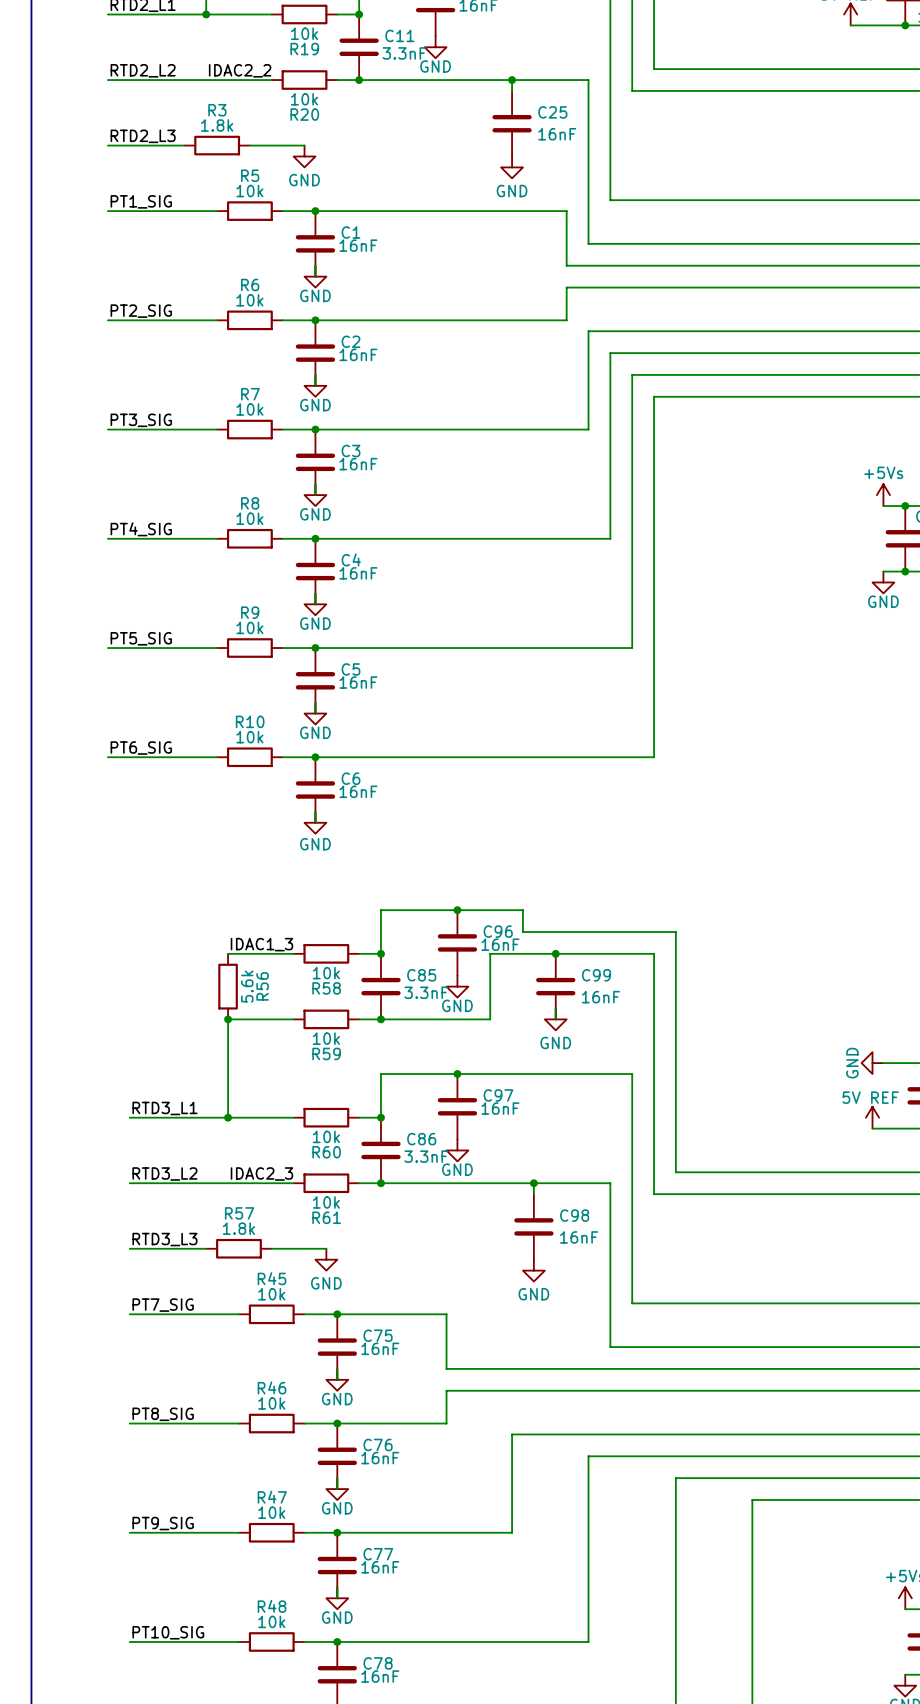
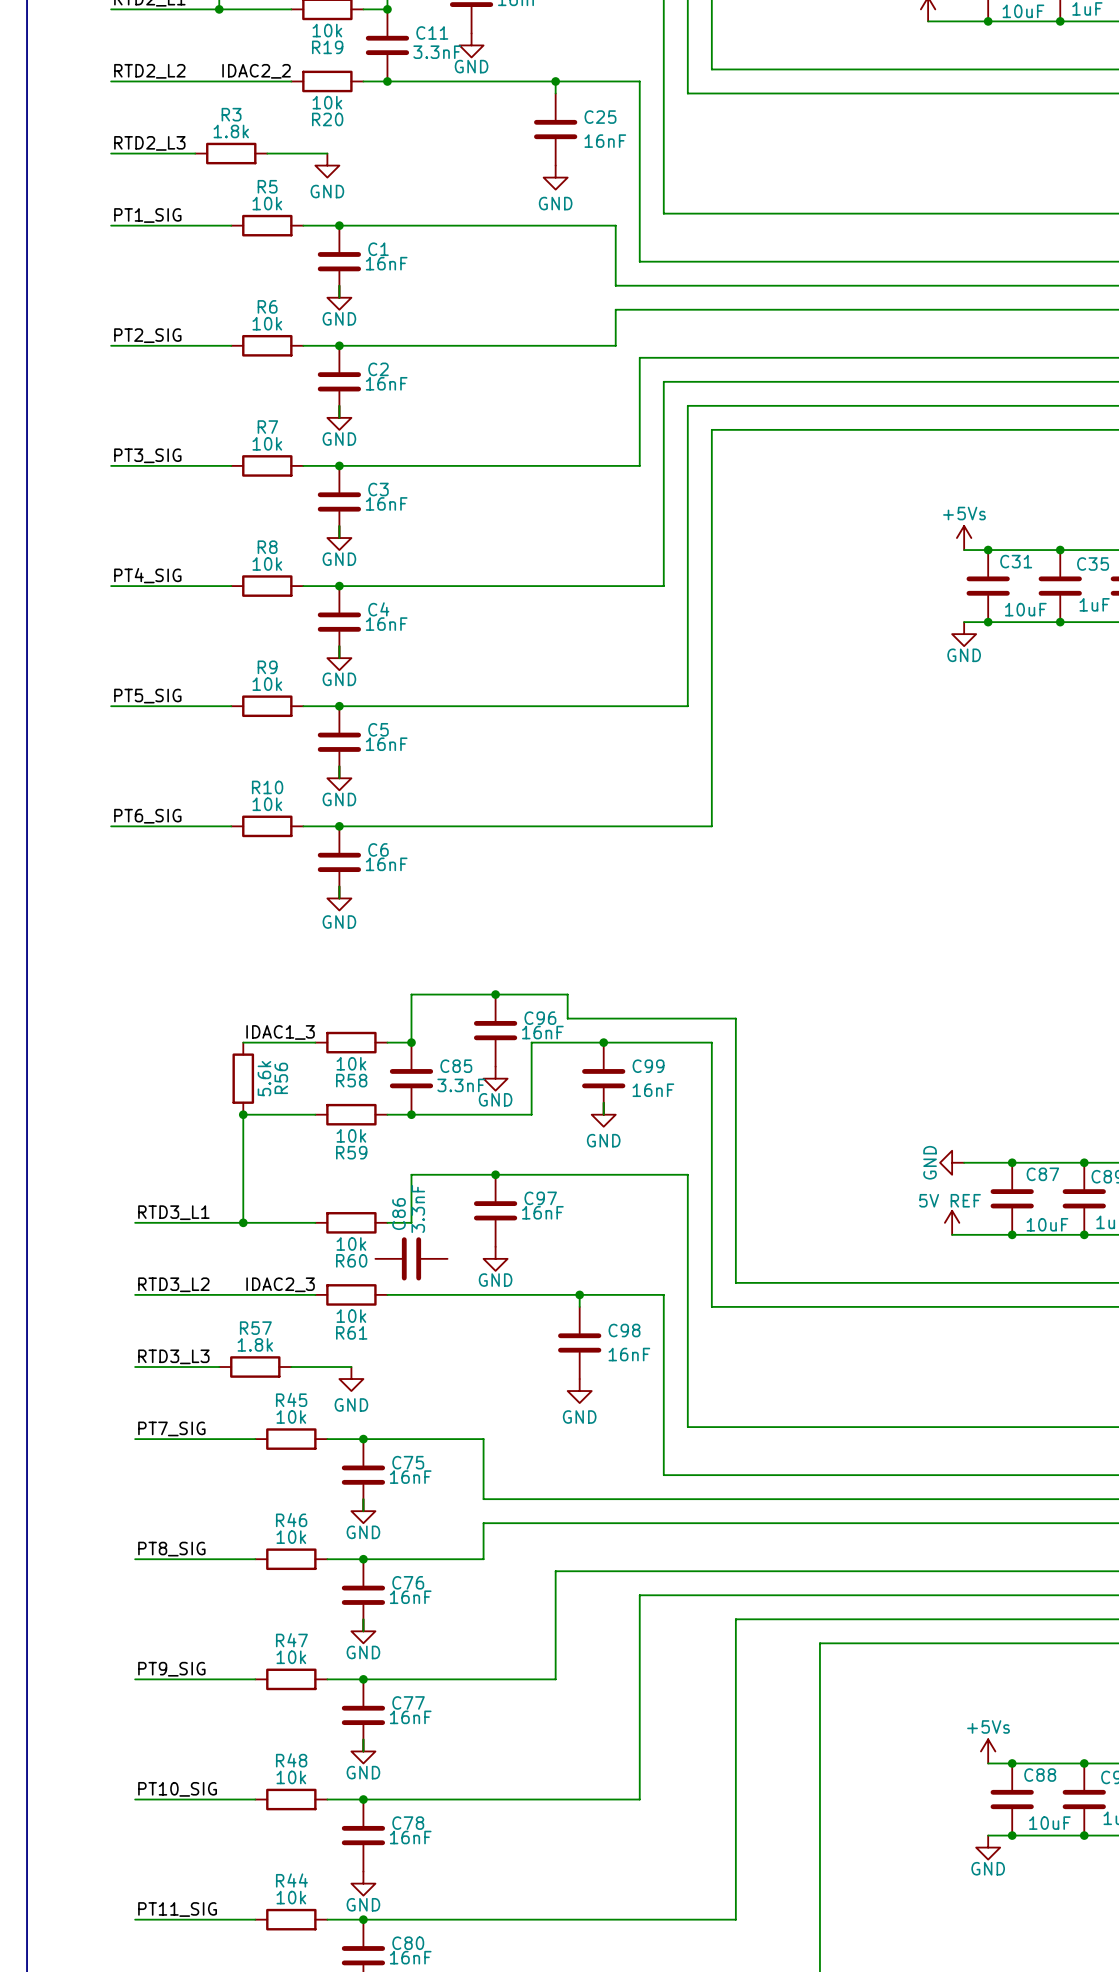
junction: (380, 1117) -> none
C86 name position: C86 (421, 1139) -> C86 (399, 1214)
C86 rotation: 0° (380, 1150) -> 90° clockwise (411, 1258)
C86 value position: 3.3nF (426, 1156) -> 3.3nF (418, 1209)
junction: (380, 1183) -> none

